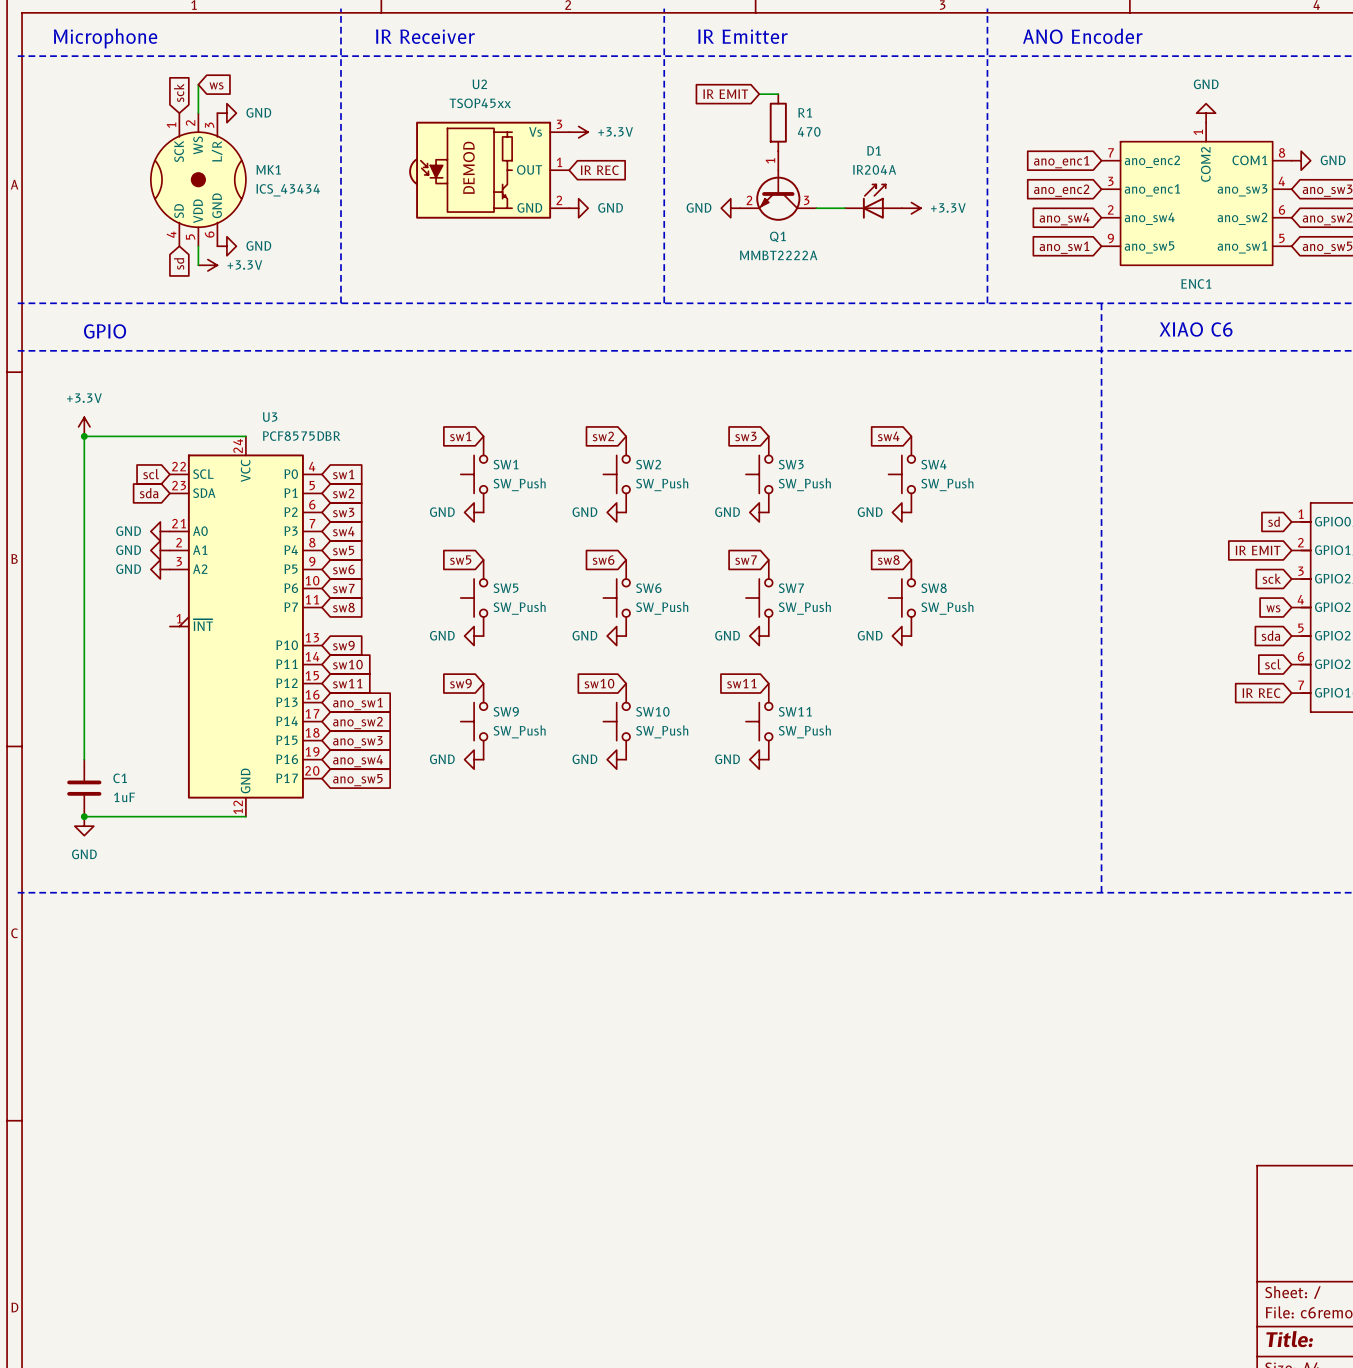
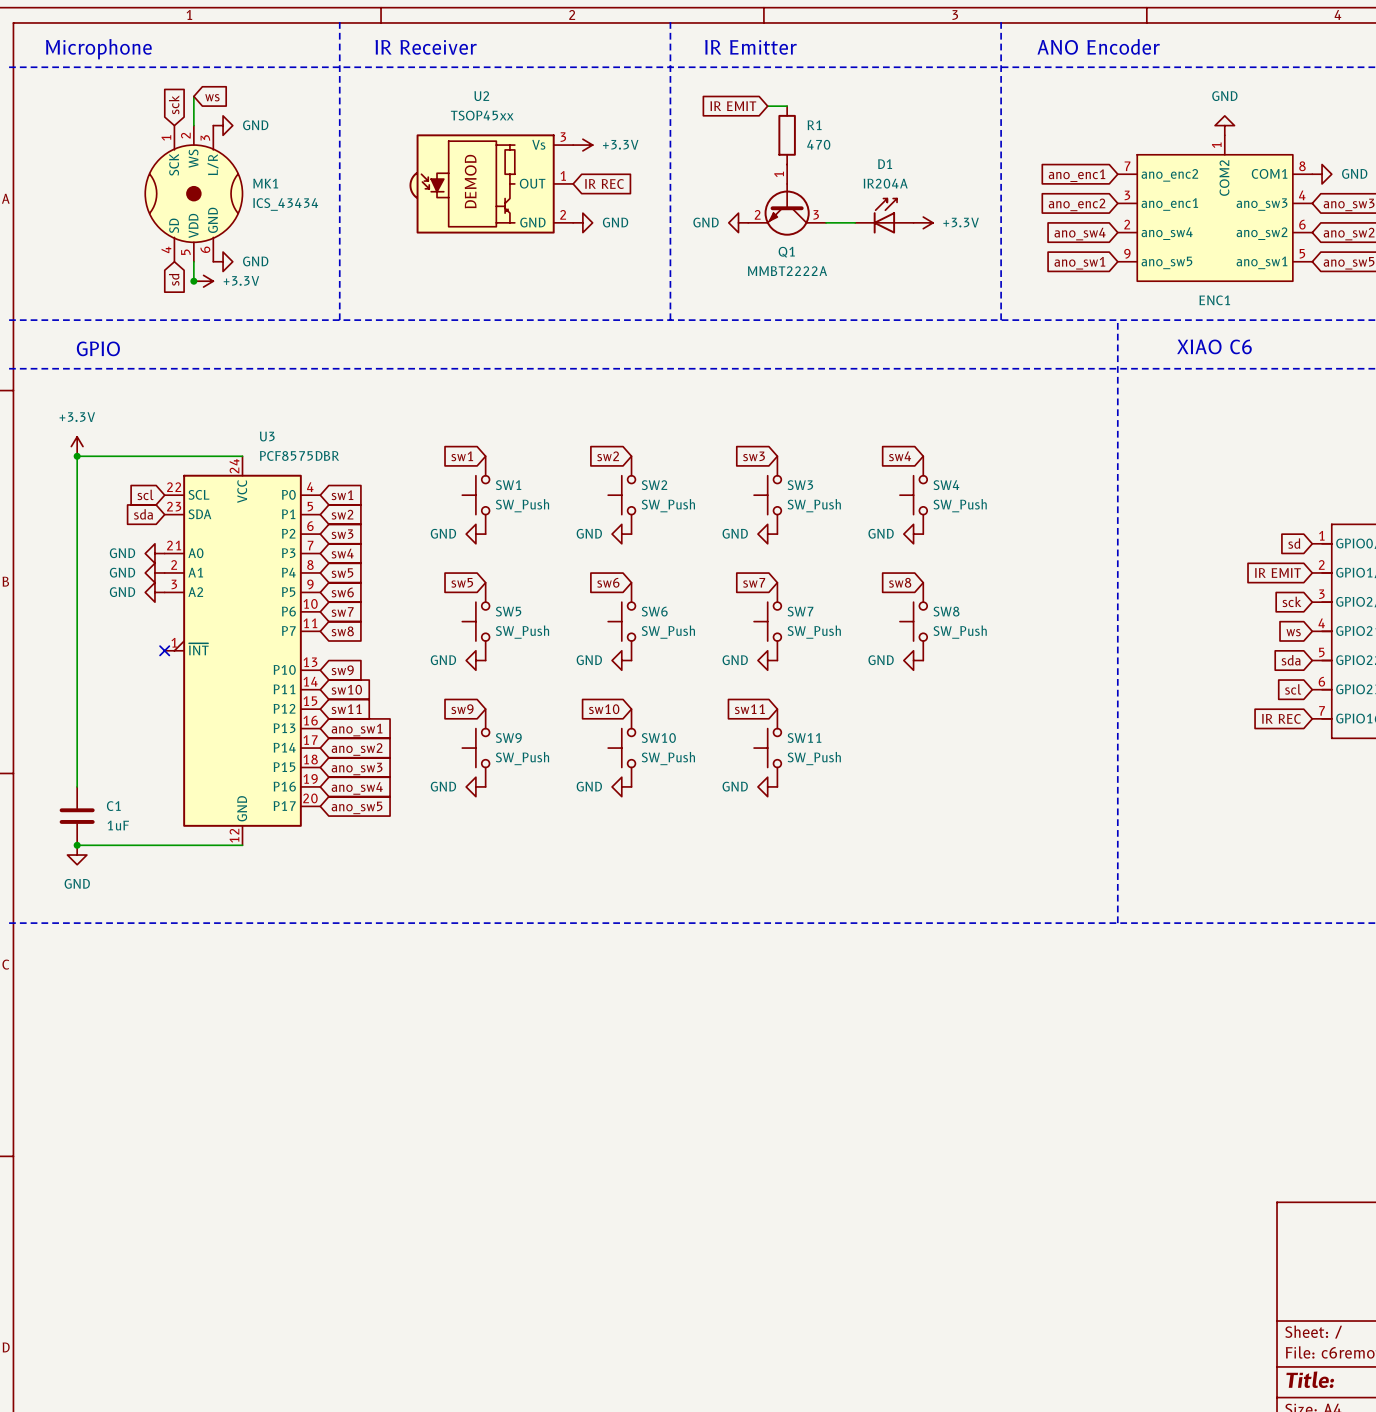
junction: none -> (193, 281)
no-connect mark: none -> (164, 650)

